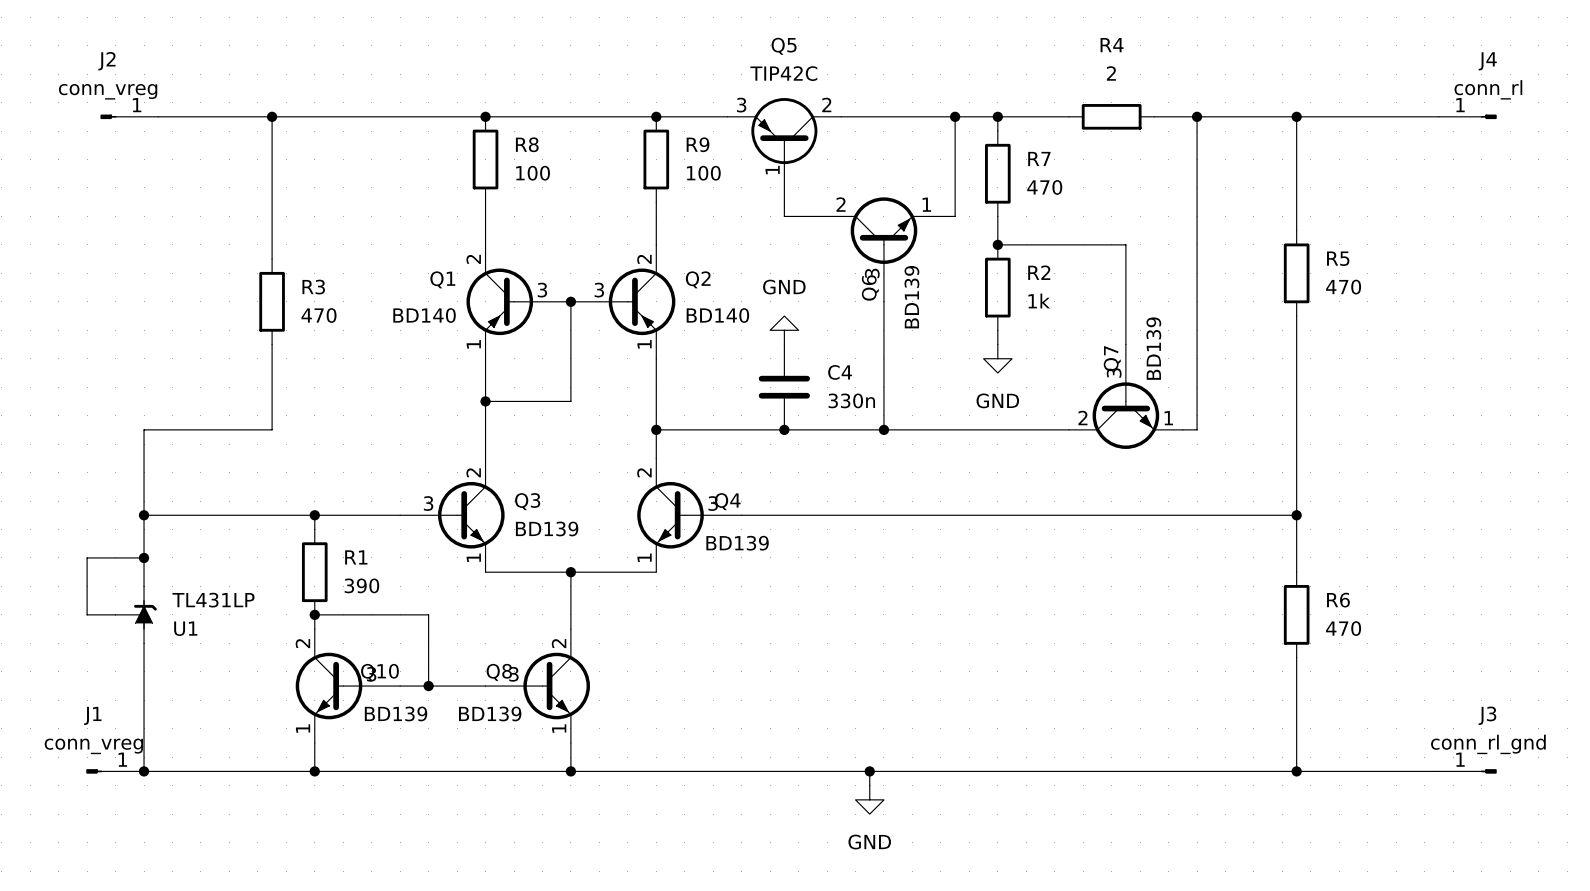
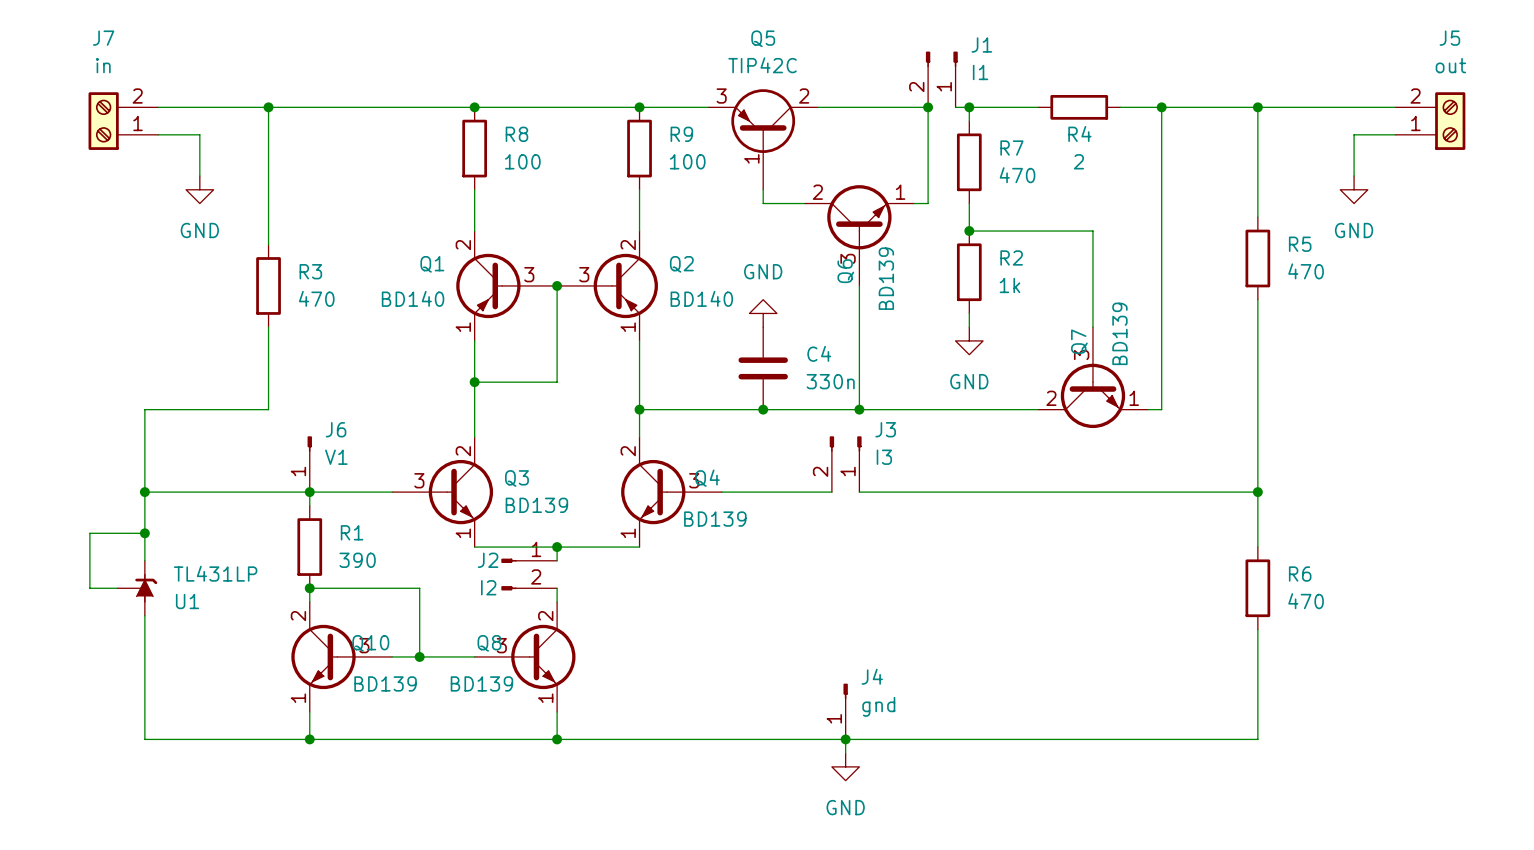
R4 name position: R4 (1112, 45) -> R4 (1079, 133)
J2 name position: J2 (106, 61) -> J2 (488, 560)
J4 name position: J4 (1487, 61) -> J4 (872, 676)
R4 value position: 2 (1111, 73) -> 2 (1078, 161)
J4 value: conn_rl (1488, 89) -> gnd (878, 706)
J2 value: conn_vreg (108, 91) -> I2 (488, 587)
J2 symbol: [100, 114, 159, 120] -> [501, 558, 558, 591]
wire: (955, 116) (983, 116) -> none
J4 position: (1467, 116) -> (845, 711)
J4 rotation: 0° (1488, 116) -> 90° counterclockwise (845, 691)
J7: none -> in (123, 121)
J5: none -> out (1430, 121)
wire: none -> (158, 134) (199, 134) (199, 176)
wire: none -> (1395, 134) (1354, 134) (1354, 176)
power symbol: none -> GND (199, 189)
power symbol: none -> GND (1354, 189)
J6: none -> V1 (309, 464)
wire: (855, 515) (883, 515) -> none
wire: (570, 586) (570, 614) -> none
J1 name position: J1 (92, 715) -> J1 (981, 45)
J3 name position: J3 (1487, 715) -> J3 (885, 429)
J3 value: conn_rl_gnd (1488, 744) -> I3 (884, 457)
J1 value: conn_vreg (93, 746) -> I1 (980, 72)
J1 symbol: [86, 769, 145, 774] -> [925, 51, 958, 108]
J3 symbol: [1438, 769, 1497, 774] -> [829, 436, 862, 493]
junction: (144, 771) -> none
wire: (1296, 771) (1438, 771) -> none
junction: (1296, 771) -> none

